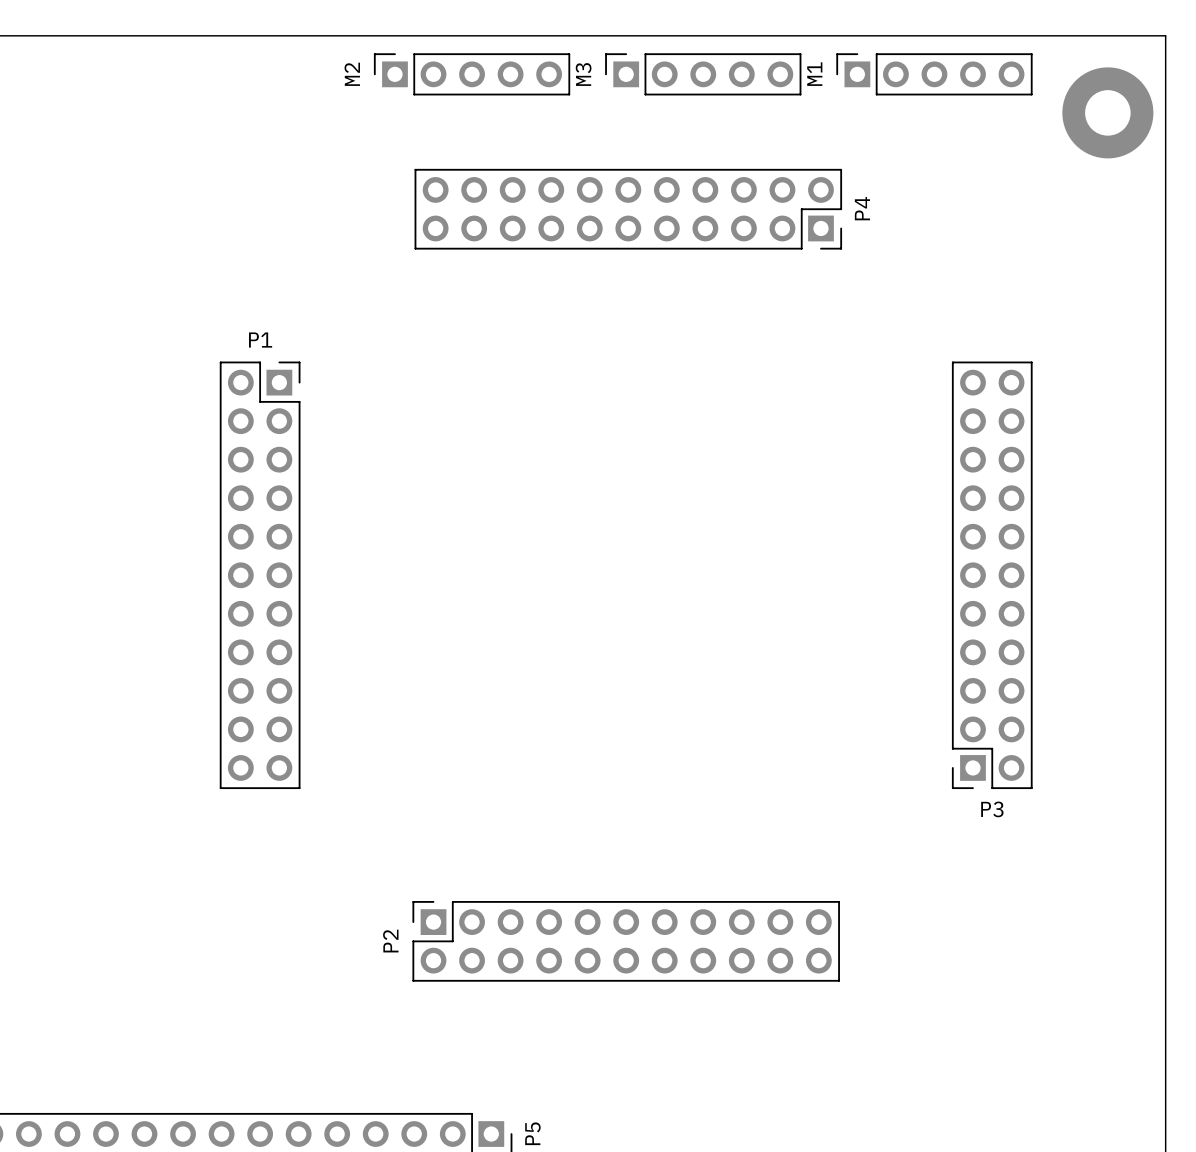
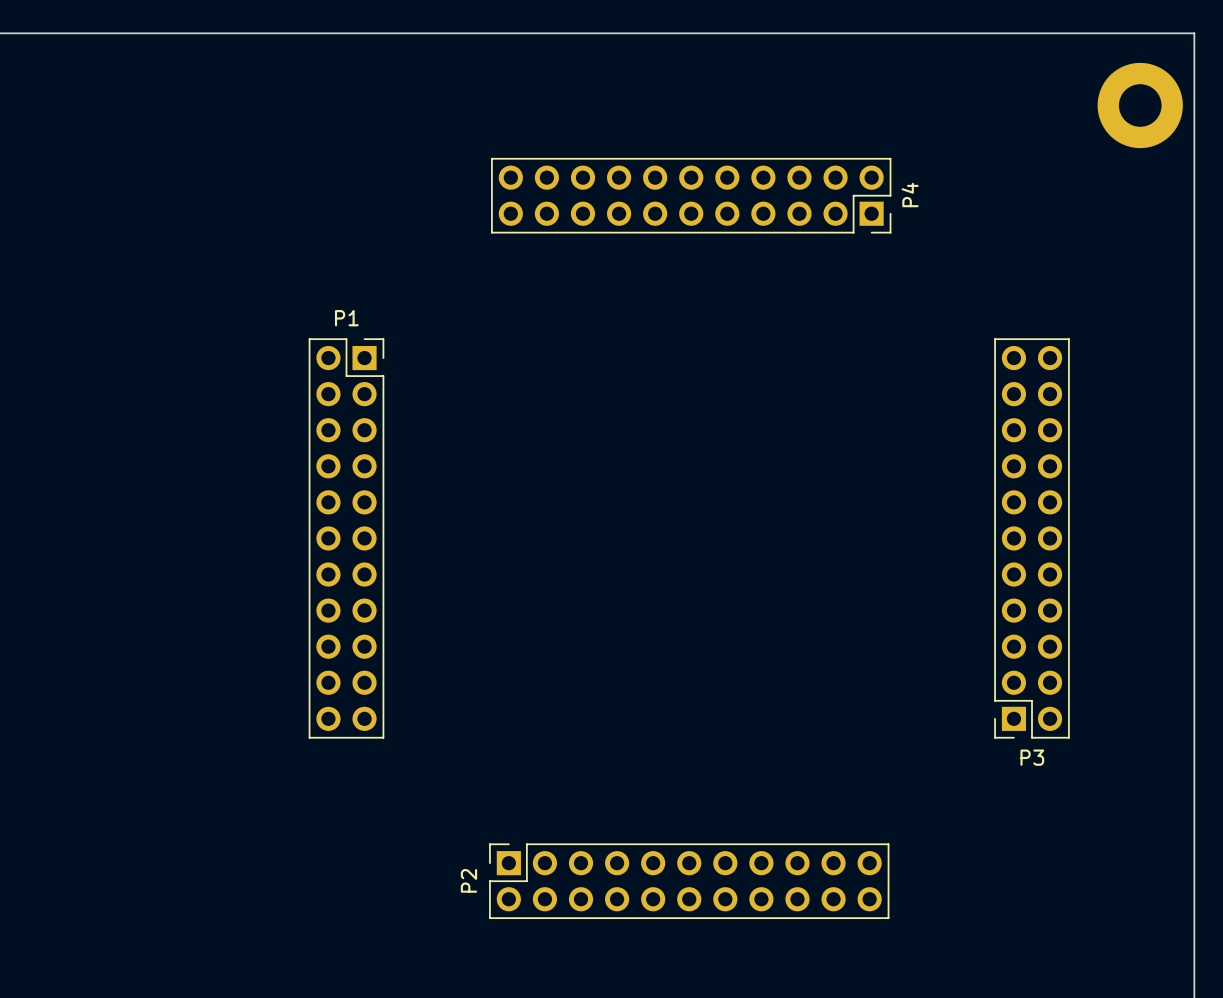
M2: (472, 74) -> none
M3: (703, 74) -> none
M1: (934, 74) -> none

